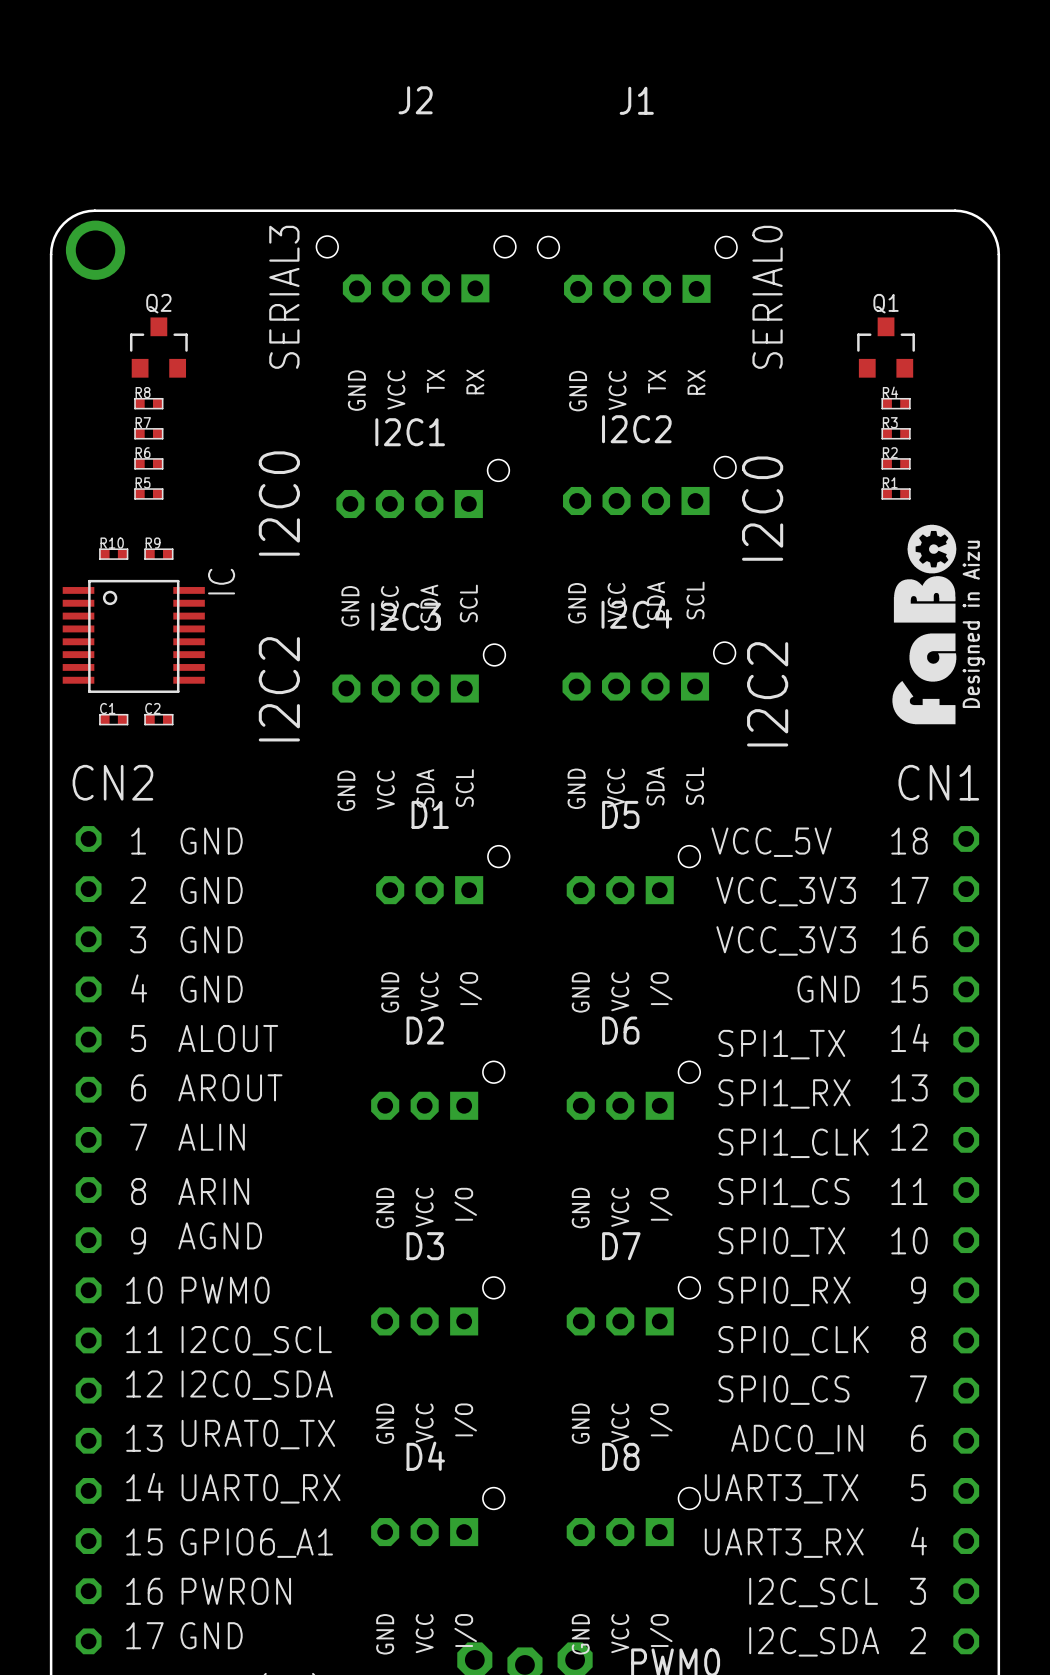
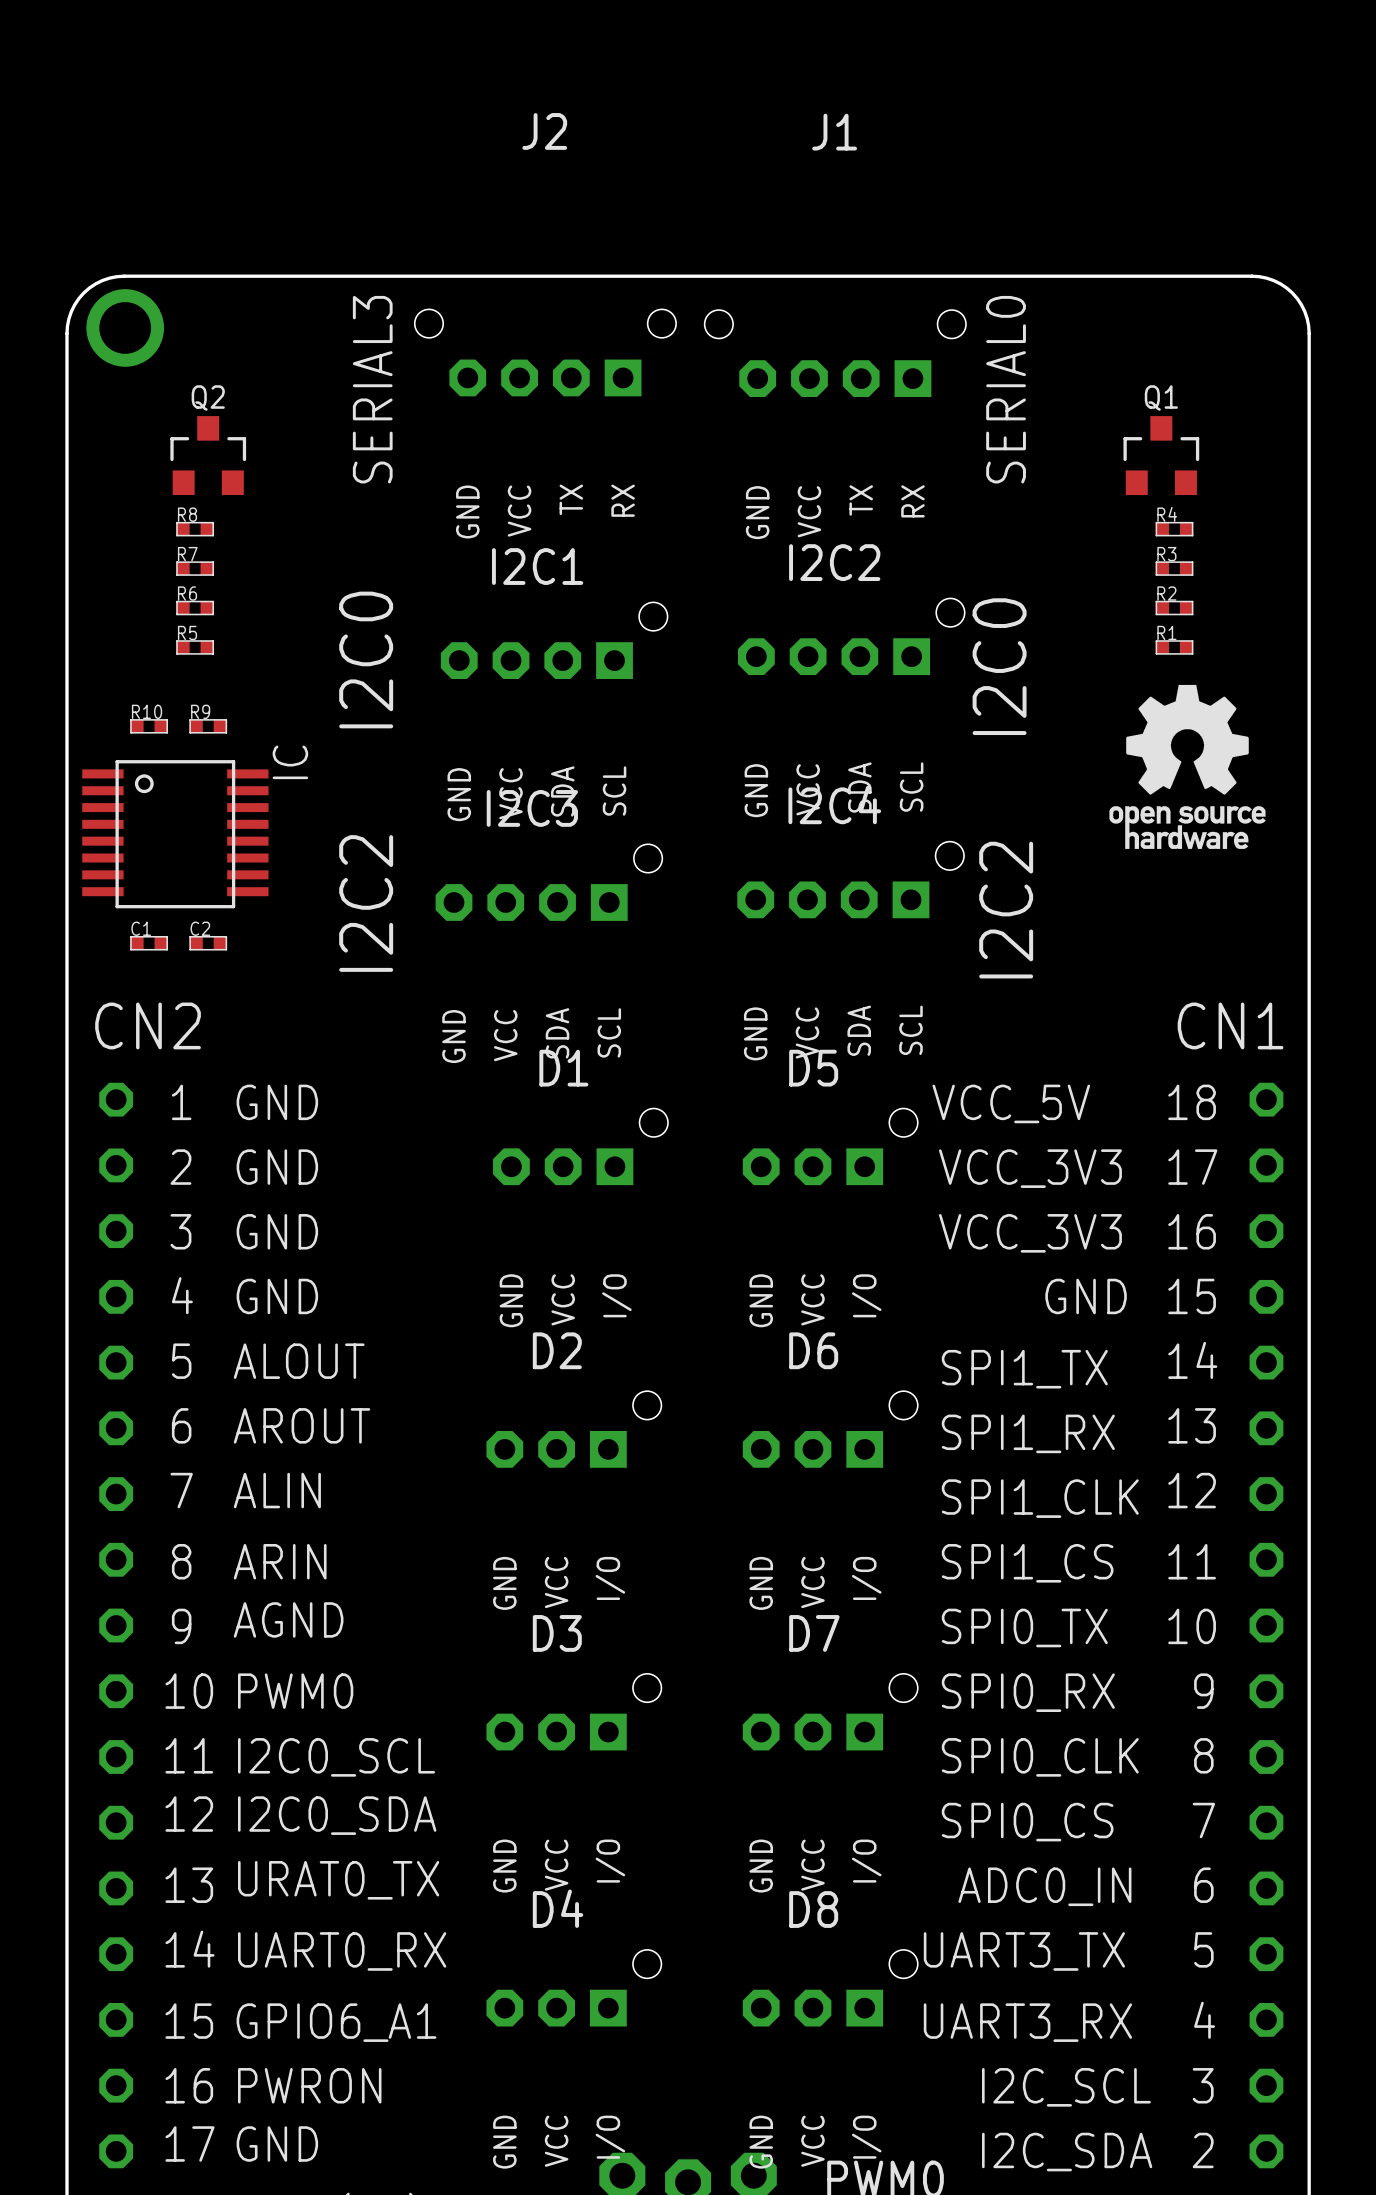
drawing: none -> [1109, 684, 1266, 849]
drawing: [892, 524, 957, 725] -> none
text: Designed in Aizu (973, 624) -> none

